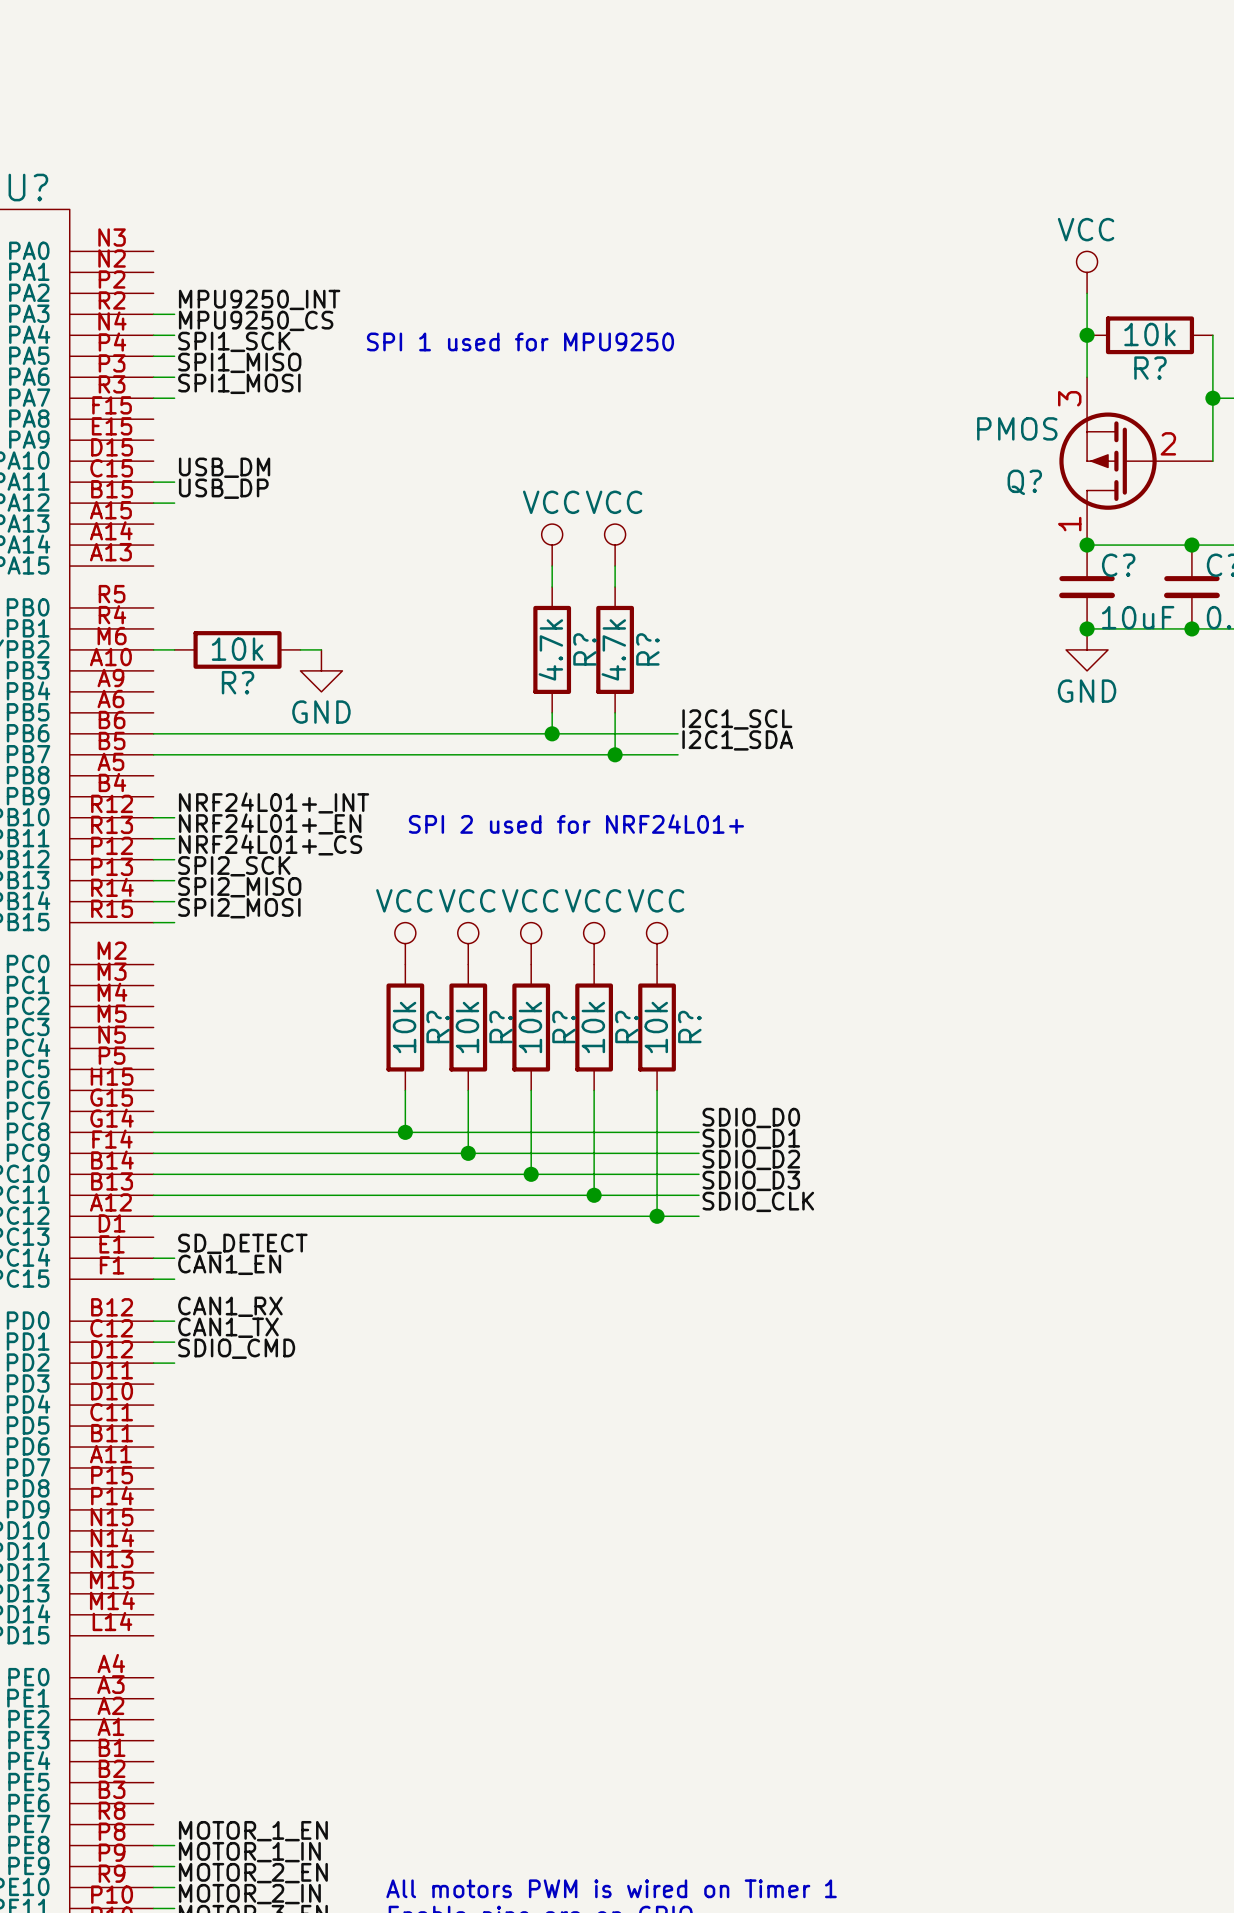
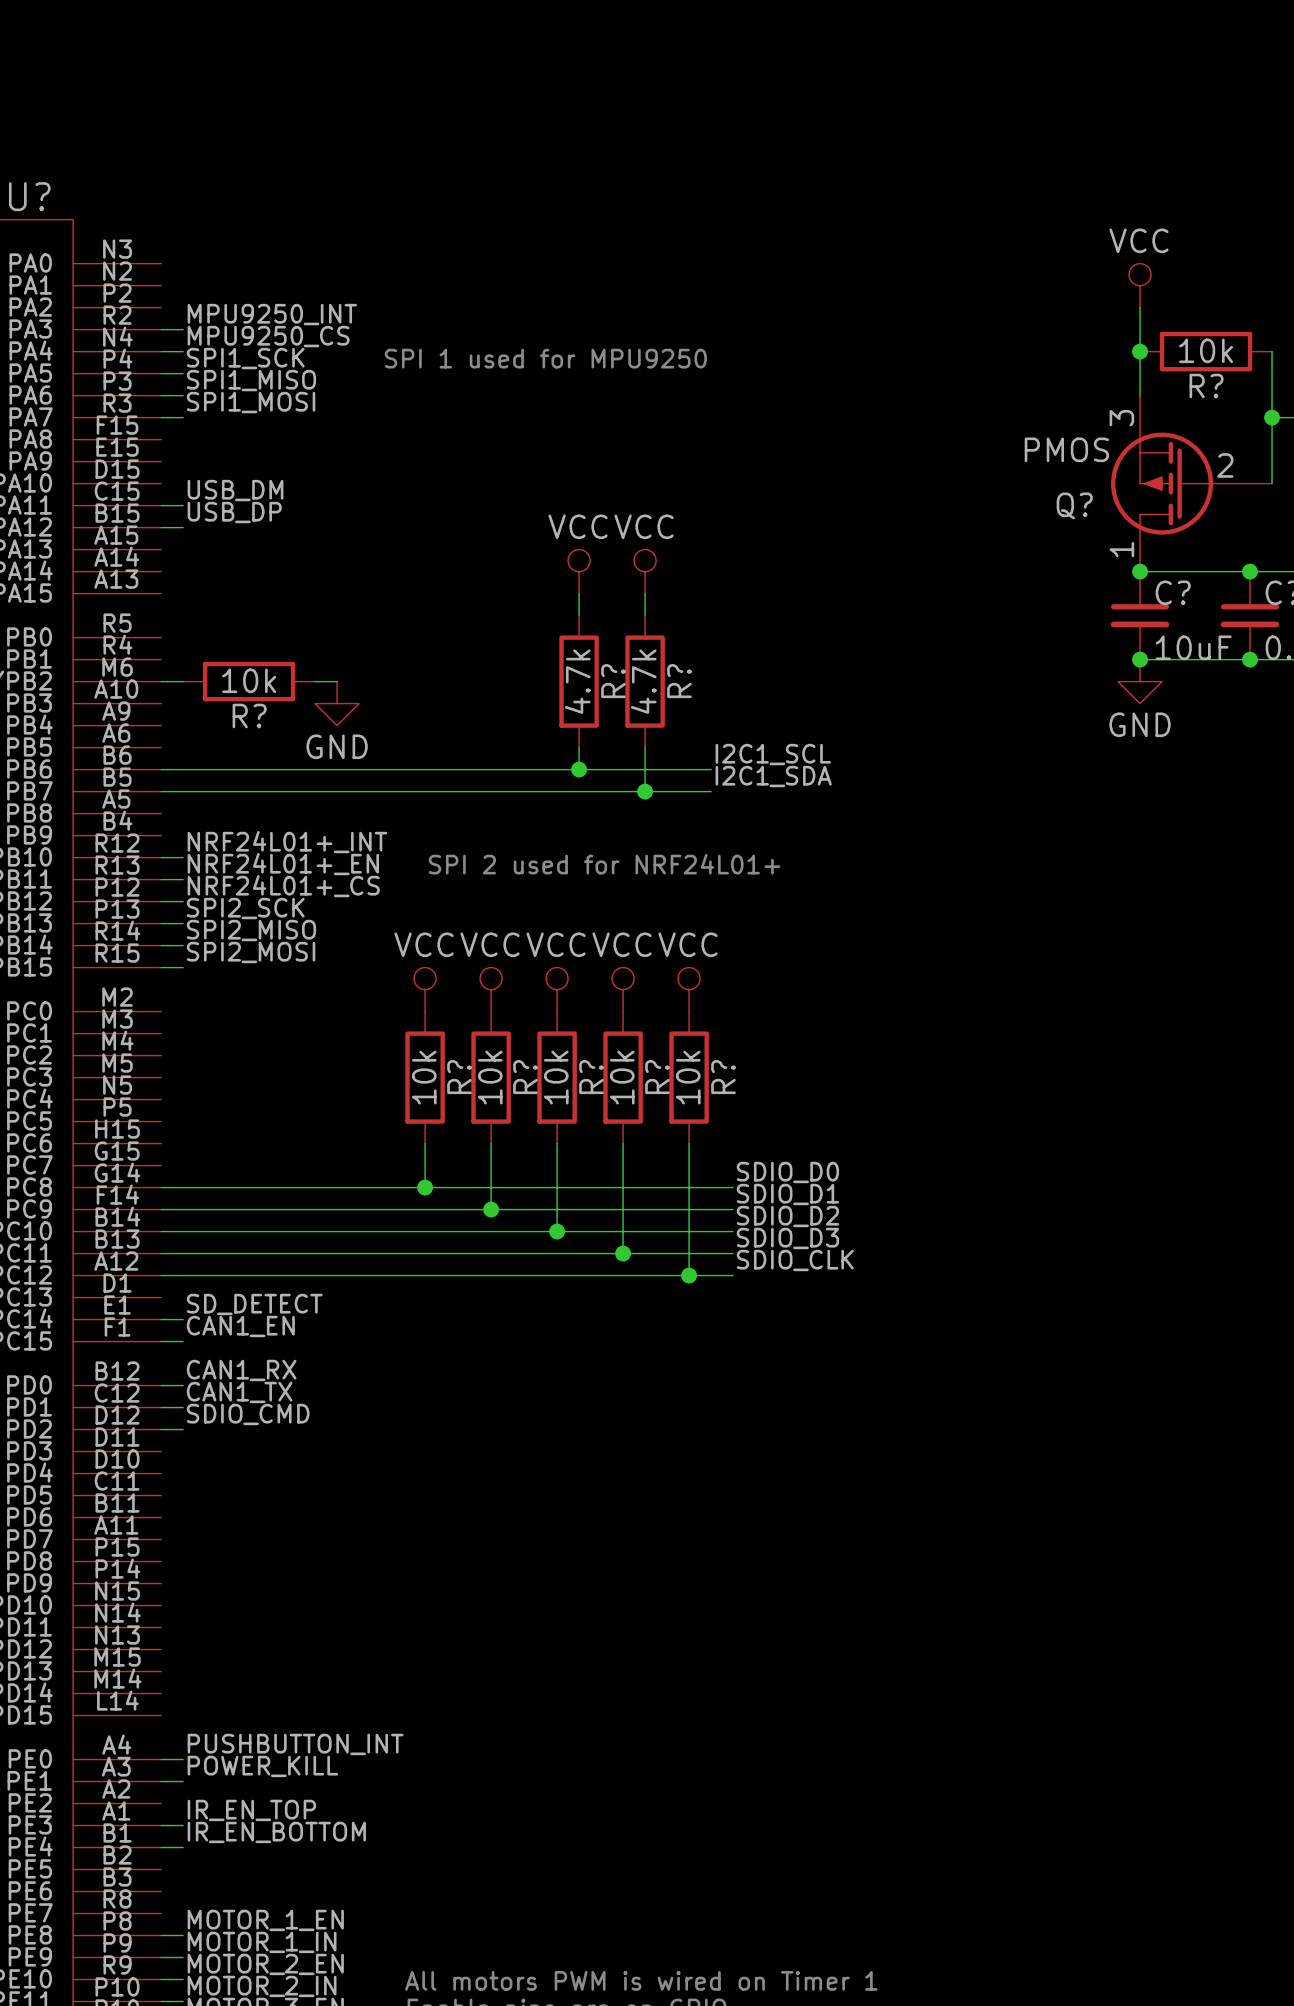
label: none -> PUSHBUTTON_INT (295, 1744)
wire: none -> (161, 1759) (183, 1759)
label: none -> POWER_KILL (262, 1766)
wire: none -> (161, 1781) (183, 1781)
label: none -> IR_EN_TOP (251, 1810)
wire: none -> (161, 1825) (183, 1825)
label: none -> IR_EN_BOTTOM (276, 1832)
wire: none -> (161, 1847) (183, 1847)

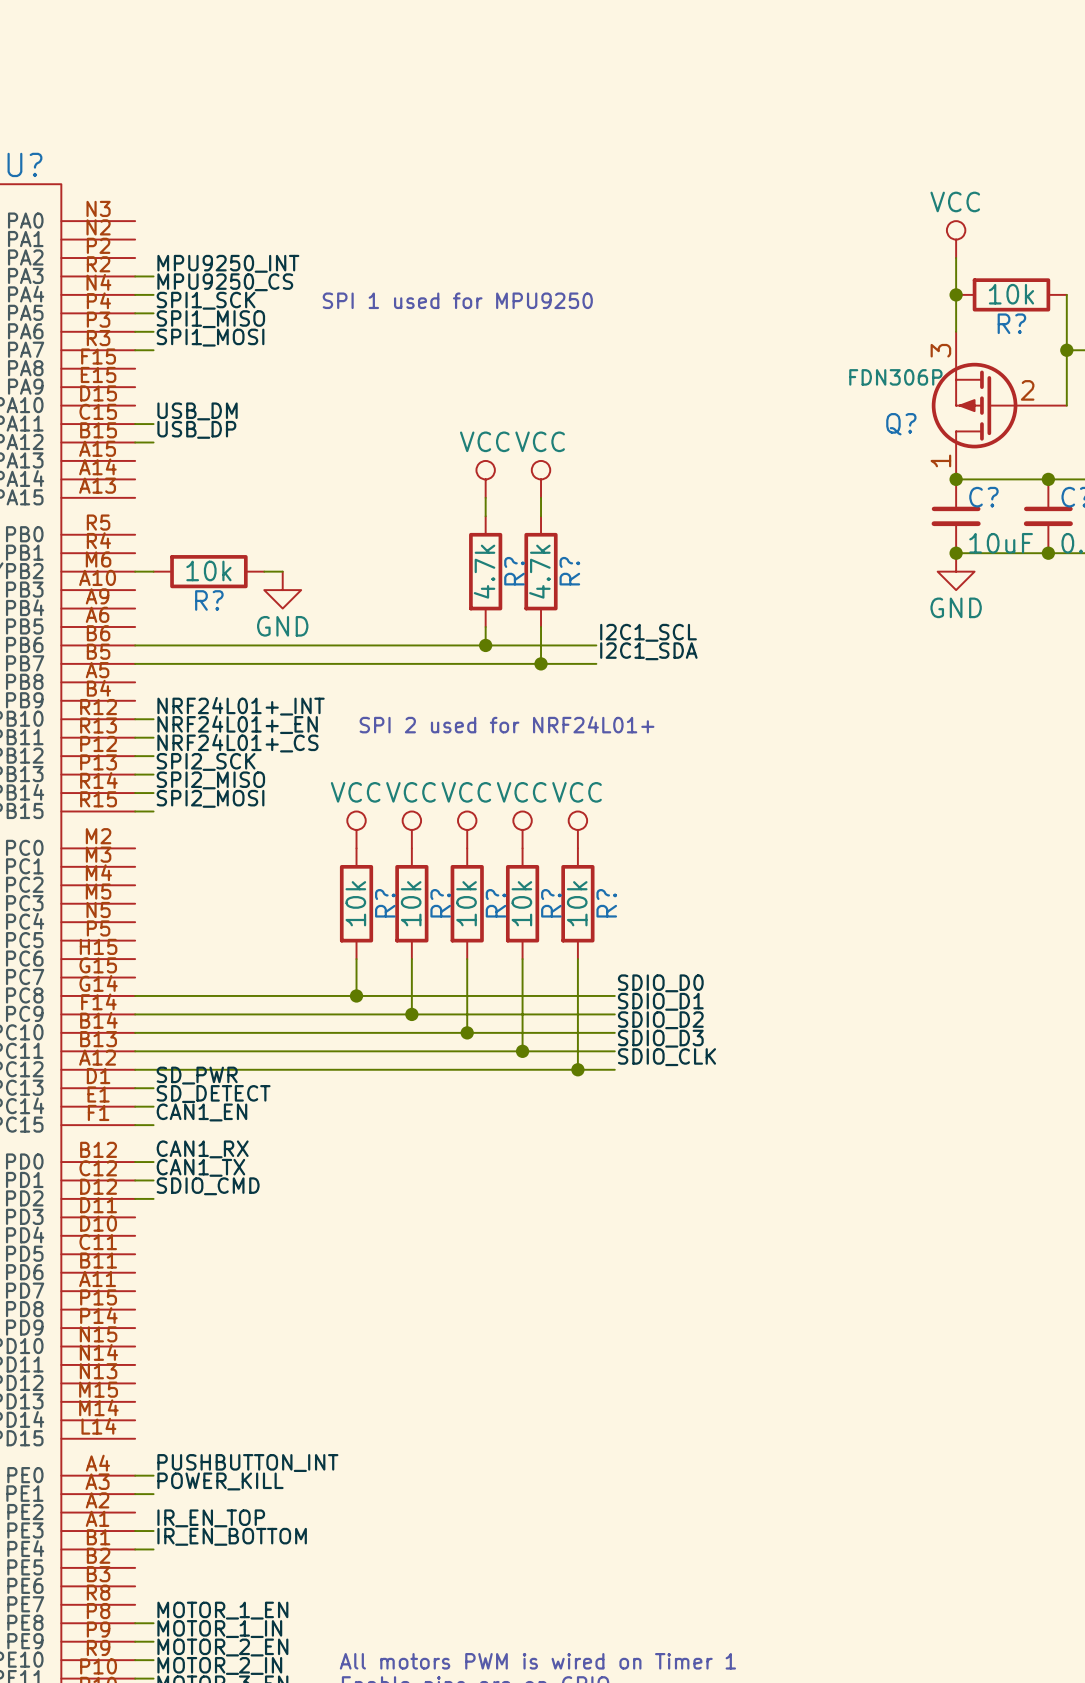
Q? value: PMOS (1066, 449) -> FDN306P (895, 377)
label: none -> SD_PWR (197, 1075)
wire: none -> (135, 1088) (153, 1088)

